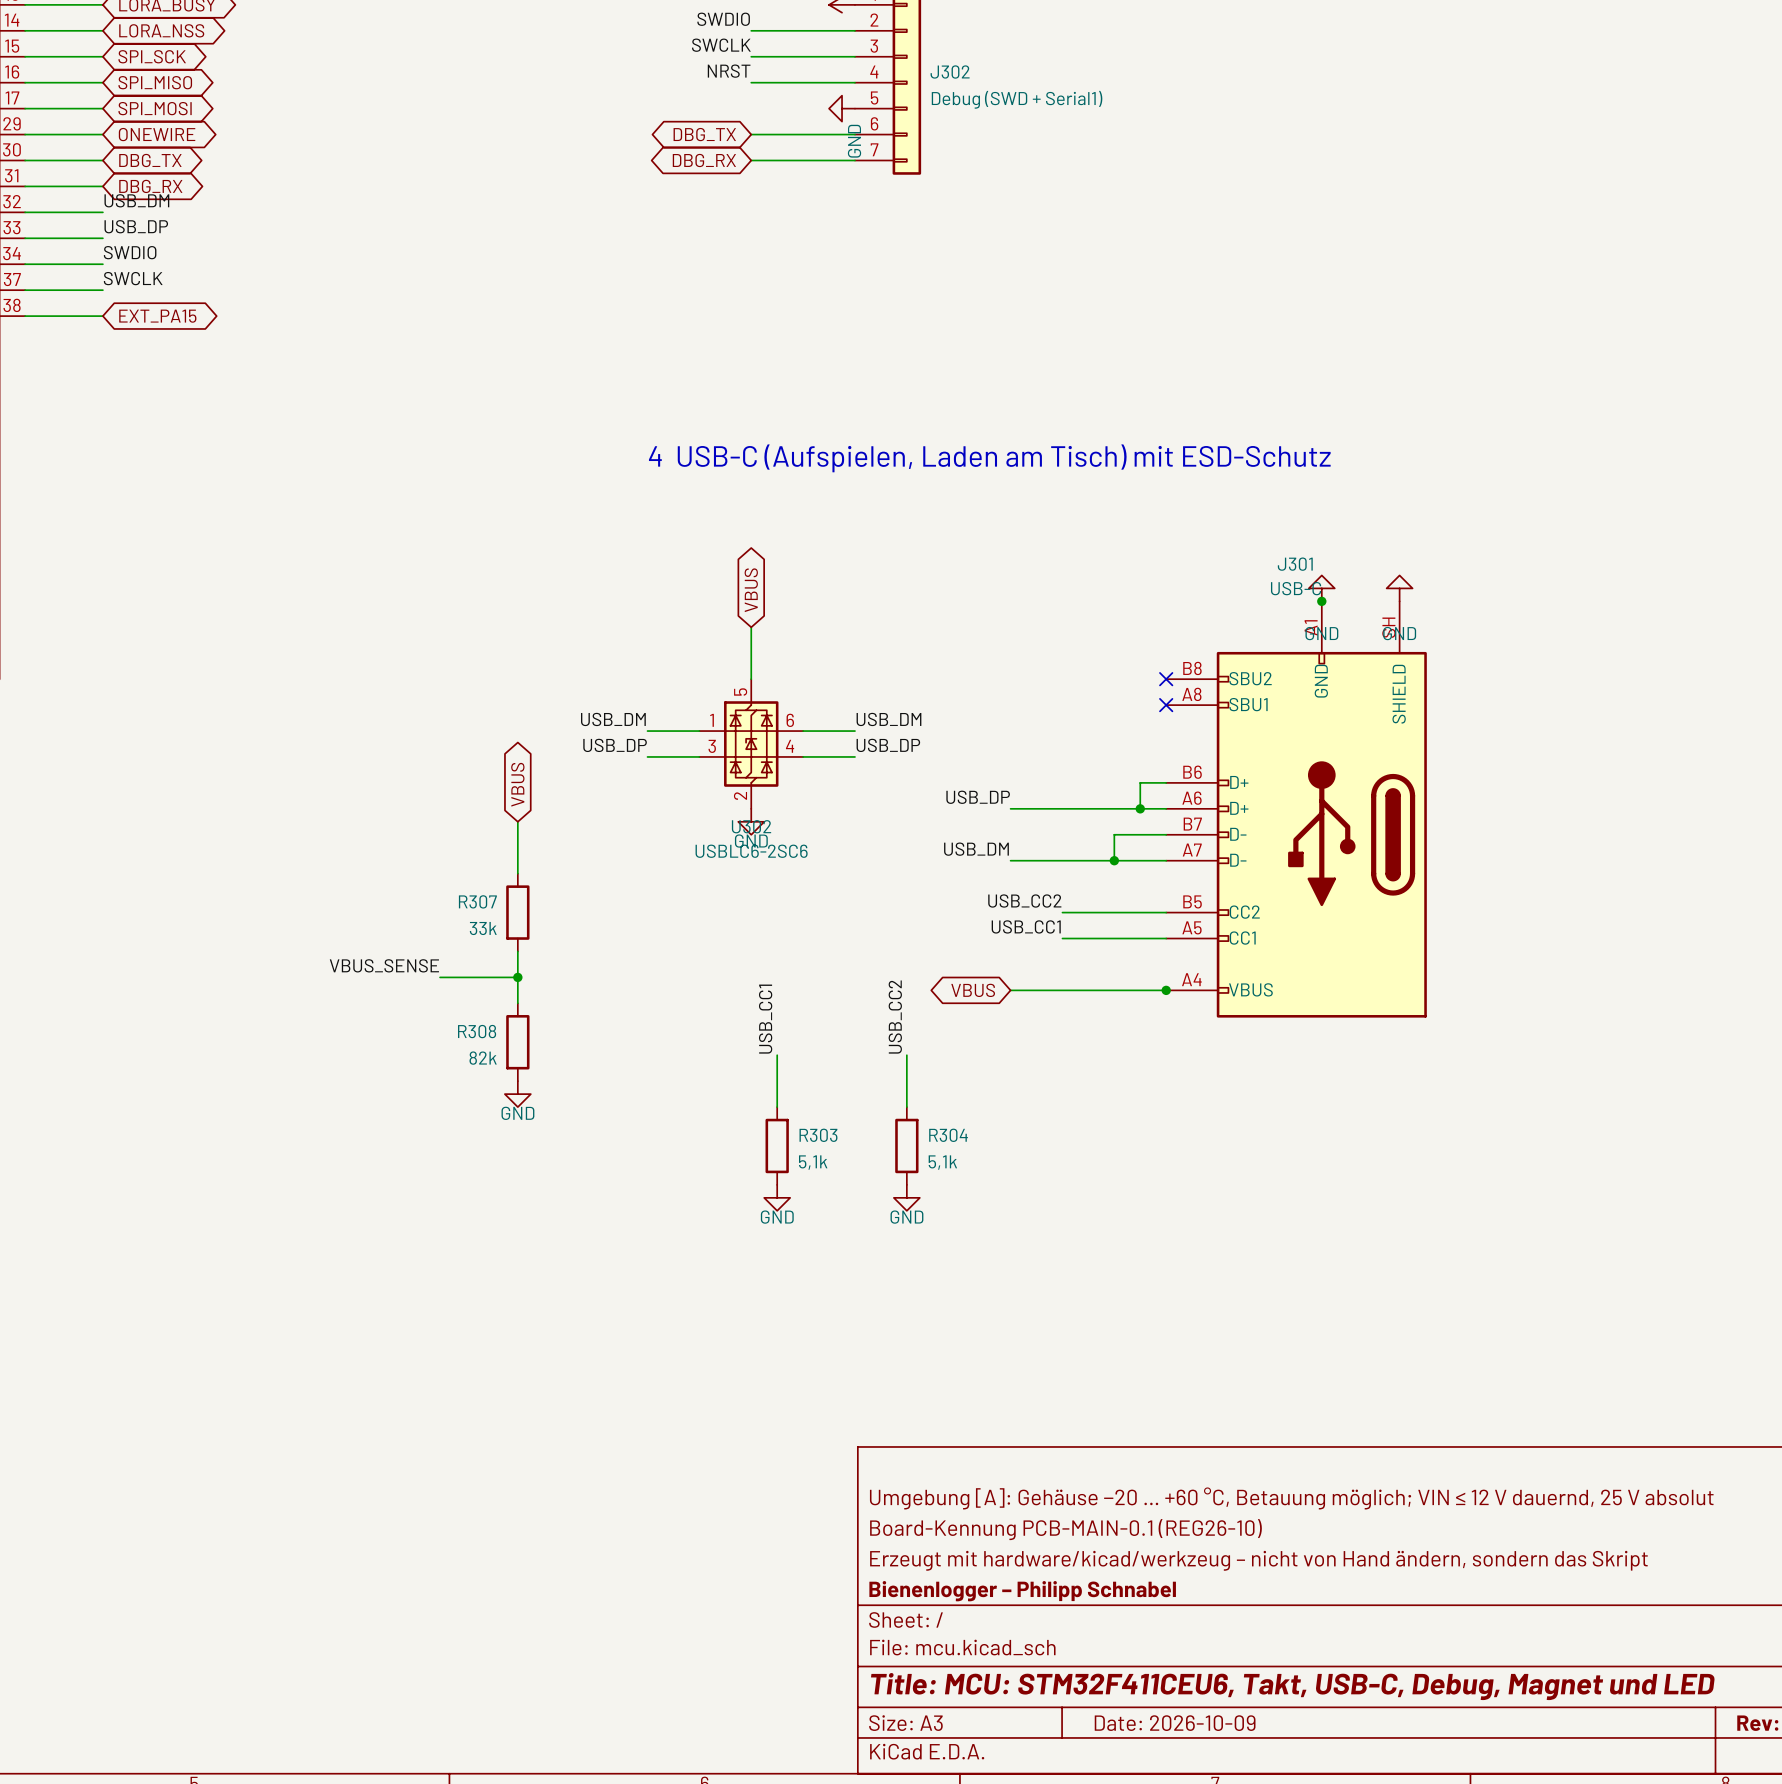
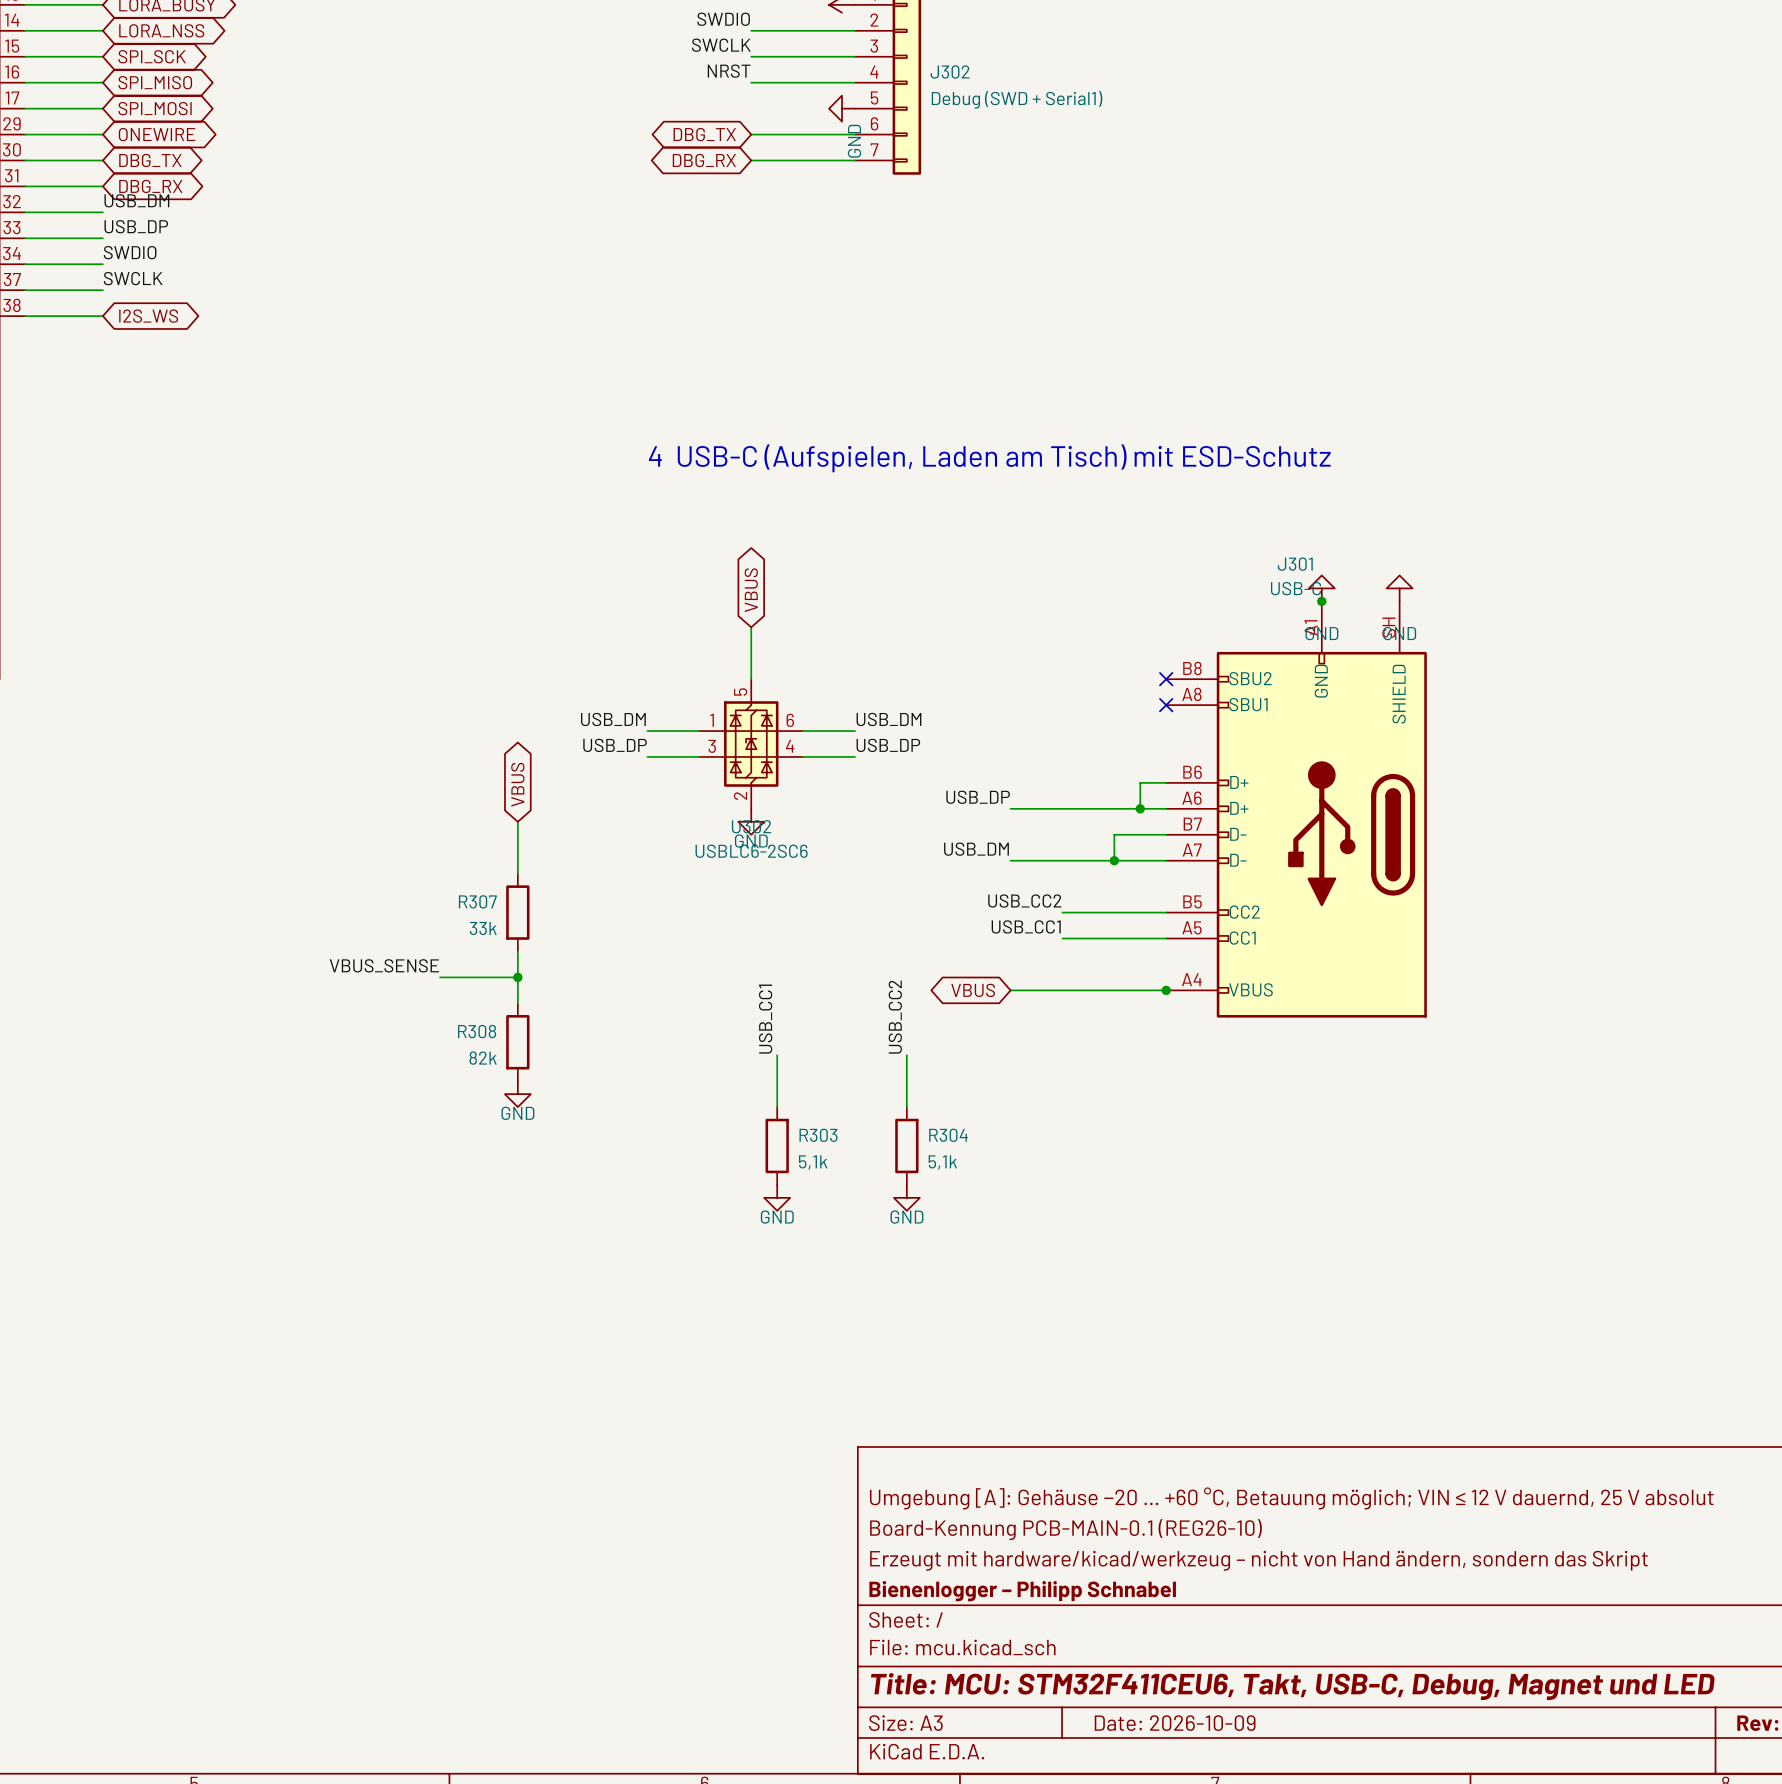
global label: EXT_PA15 (157, 316) -> I2S_WS (148, 316)

